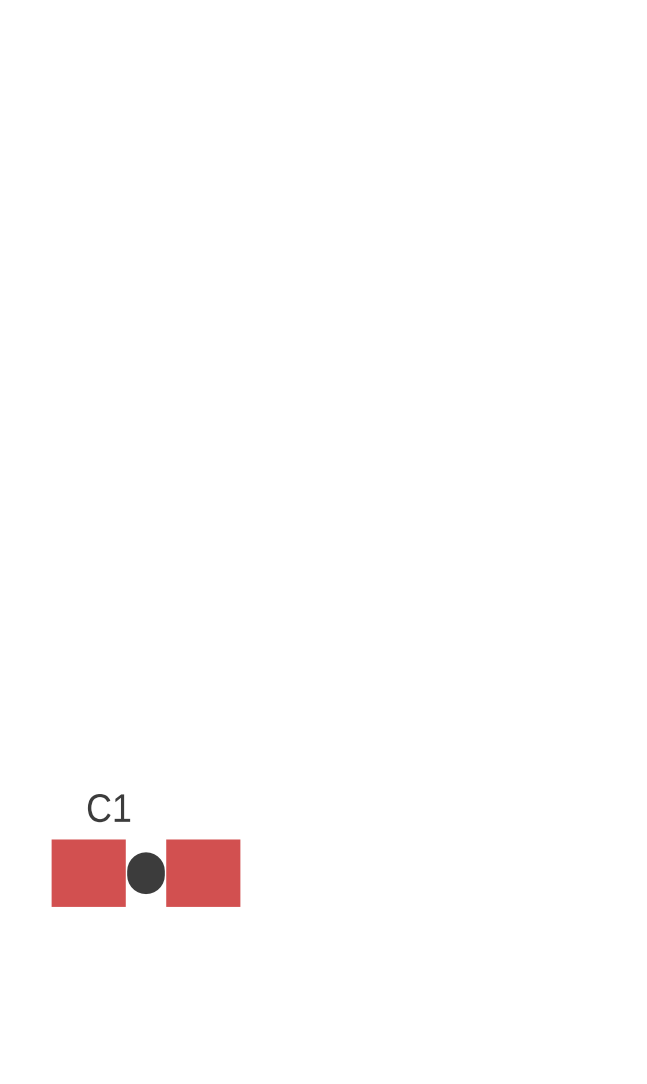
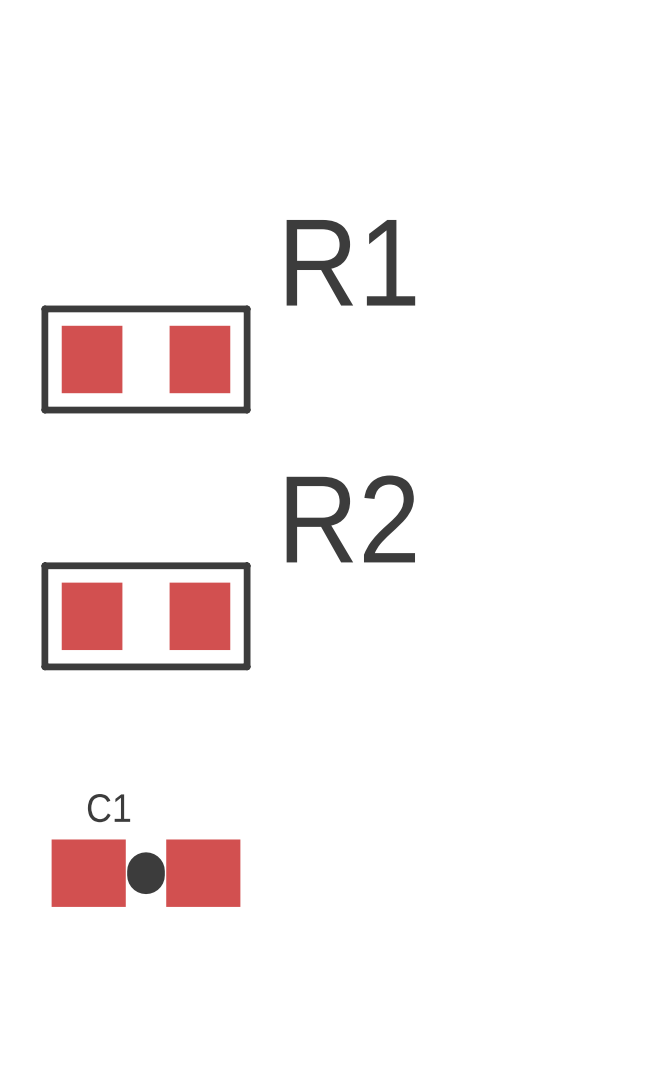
R1: none -> (146, 359)
R2: none -> (146, 616)

